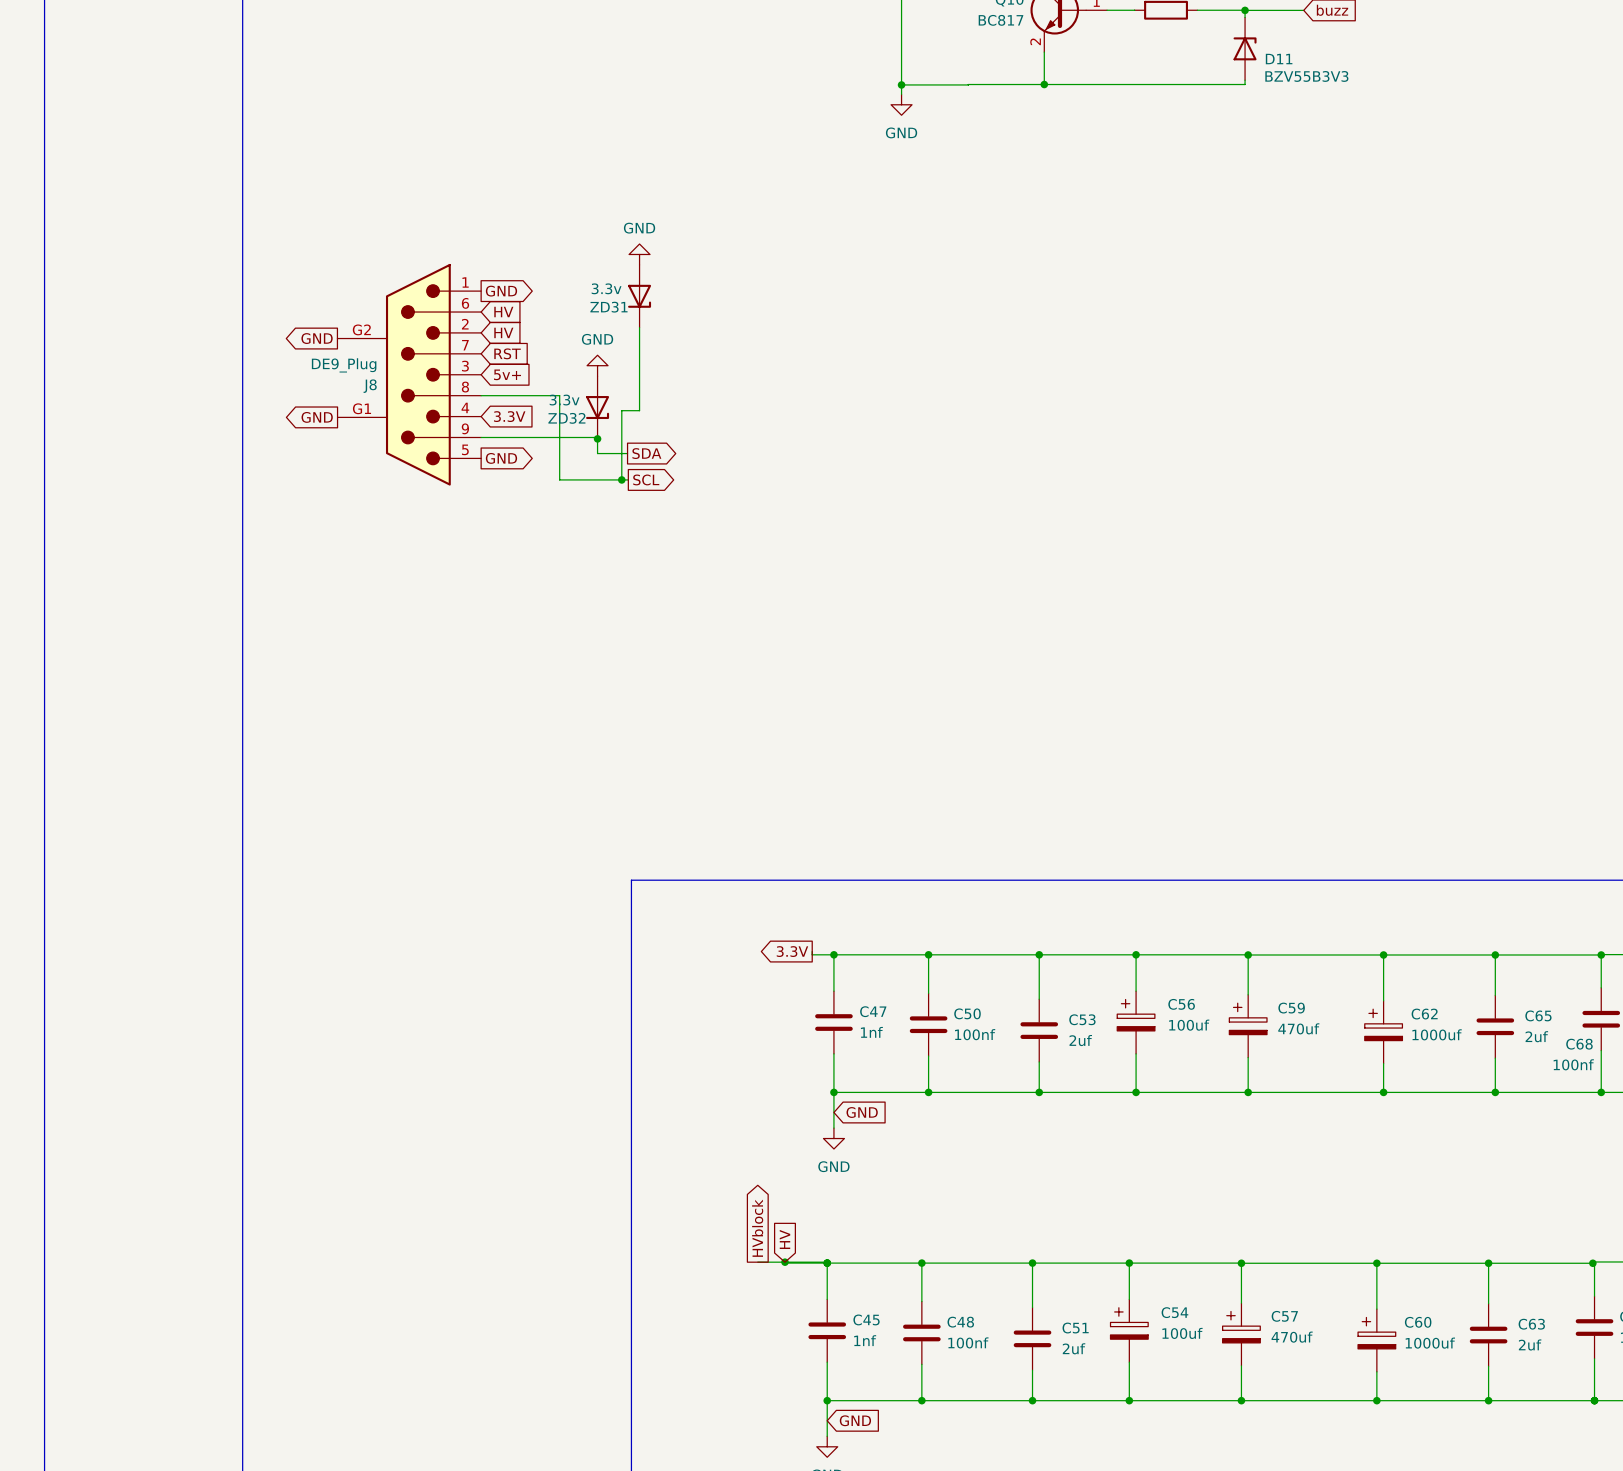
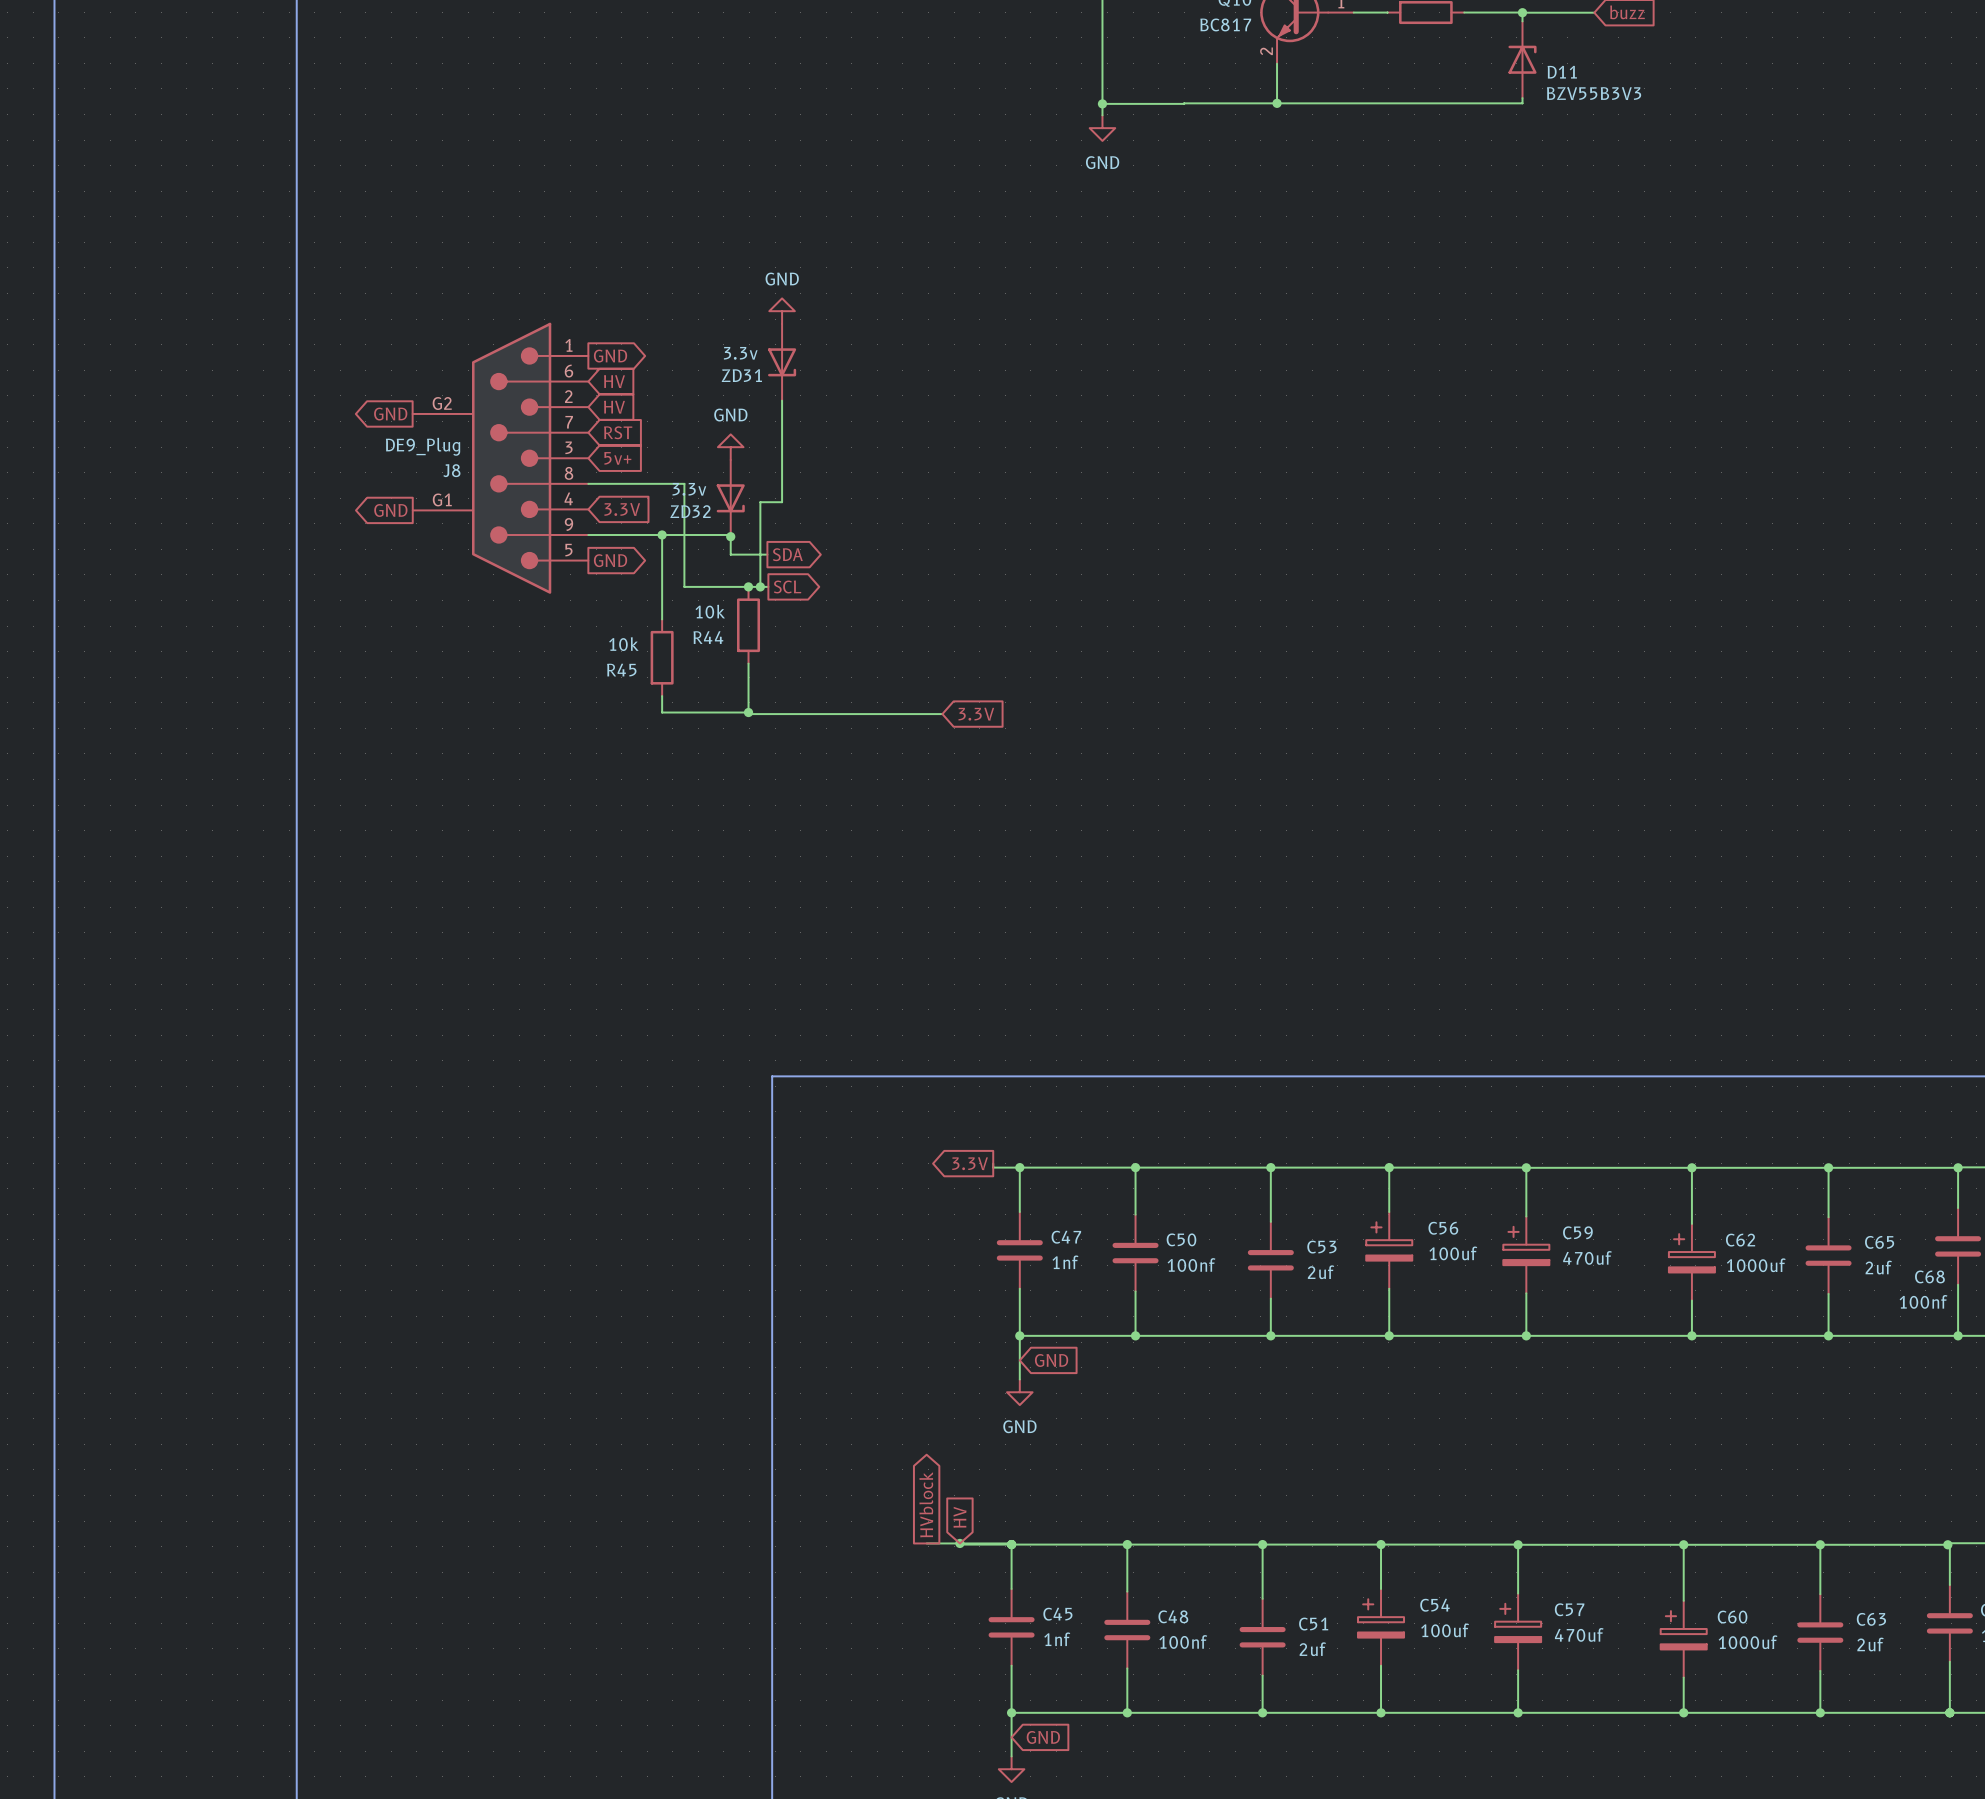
wire: none -> (662, 534) (662, 619)
junction: none -> (662, 534)
junction: none -> (748, 586)
R44: none -> 10k (748, 625)
R45: none -> 10k (662, 657)
wire: none -> (748, 663) (748, 714) (942, 714)
wire: none -> (662, 696) (662, 712) (748, 712)
junction: none -> (748, 712)
global label: none -> 3.3V (976, 714)

